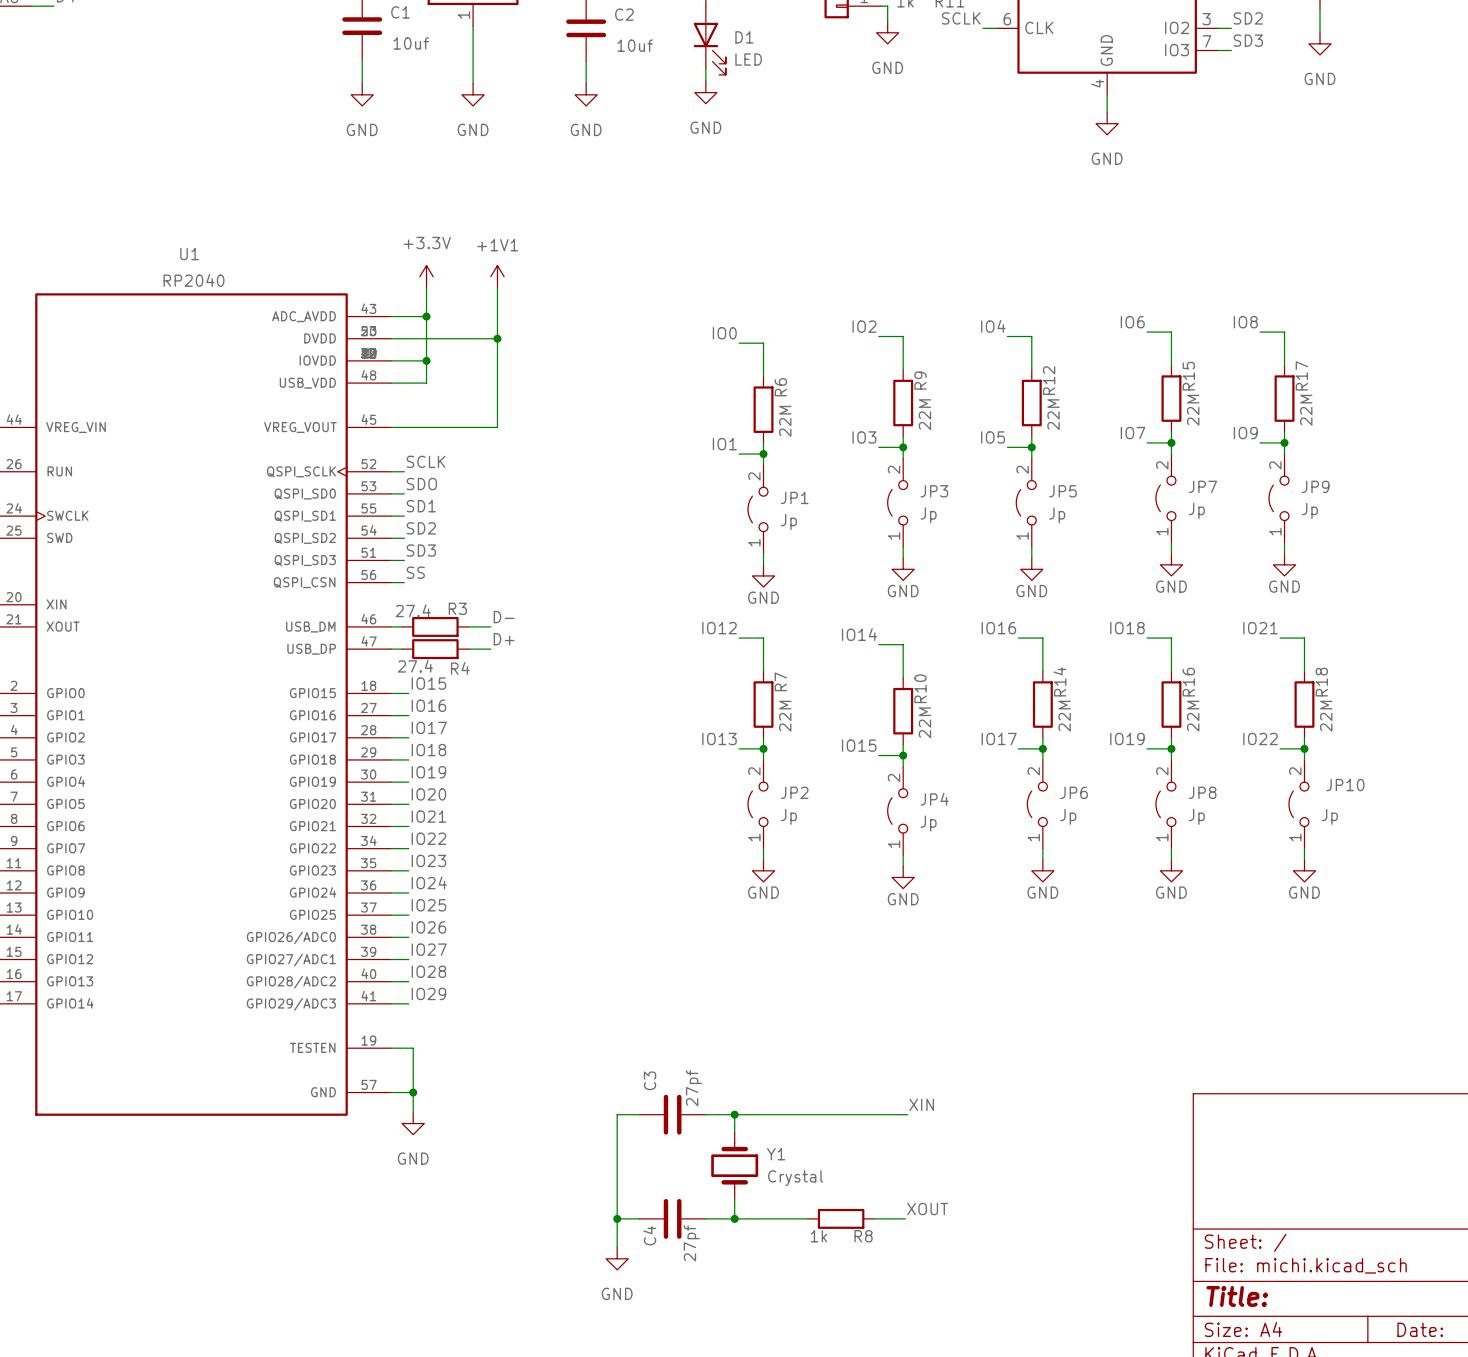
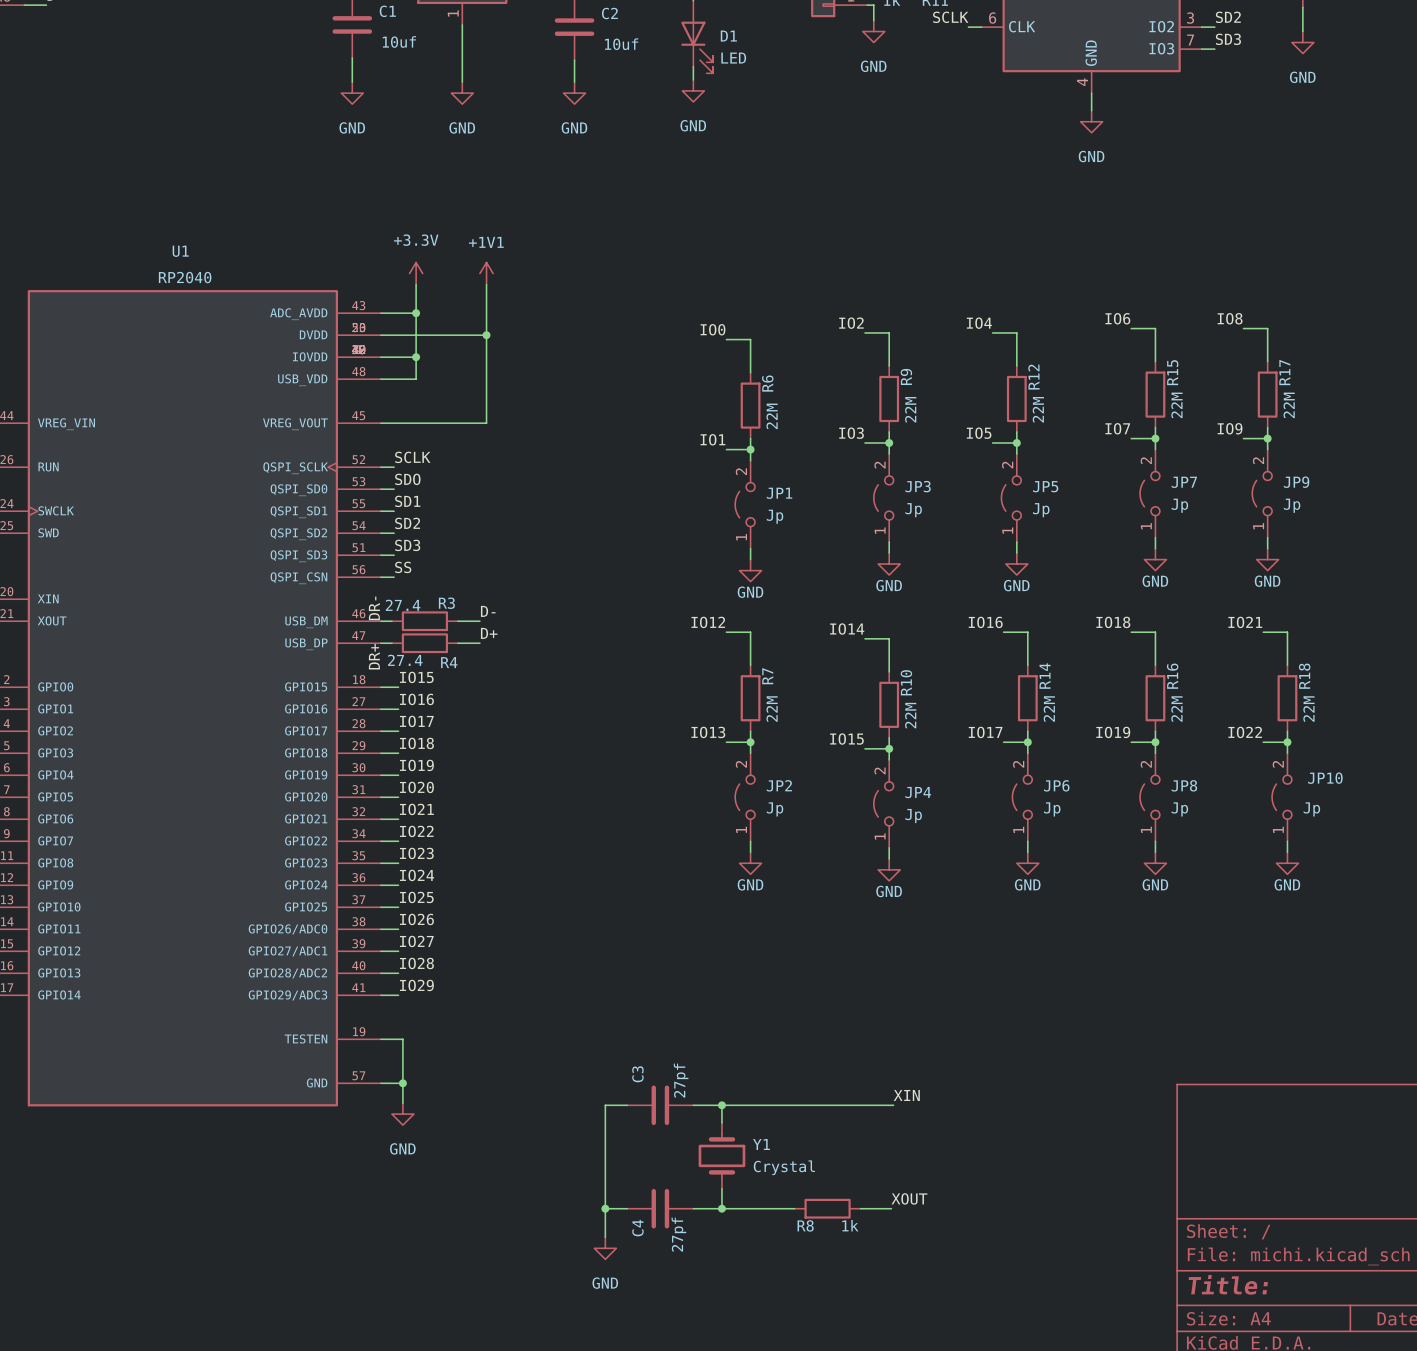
label: none -> DR- (374, 608)
label: none -> DR+ (374, 656)
R8 value position: 1k (818, 1236) -> 1k (850, 1225)
R8 name position: R8 (863, 1236) -> R8 (805, 1225)

